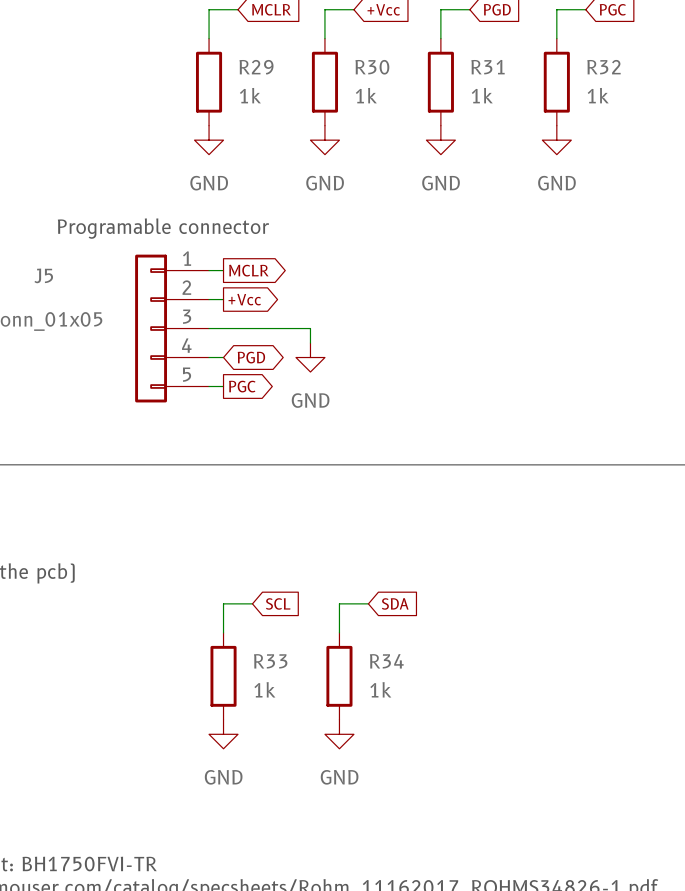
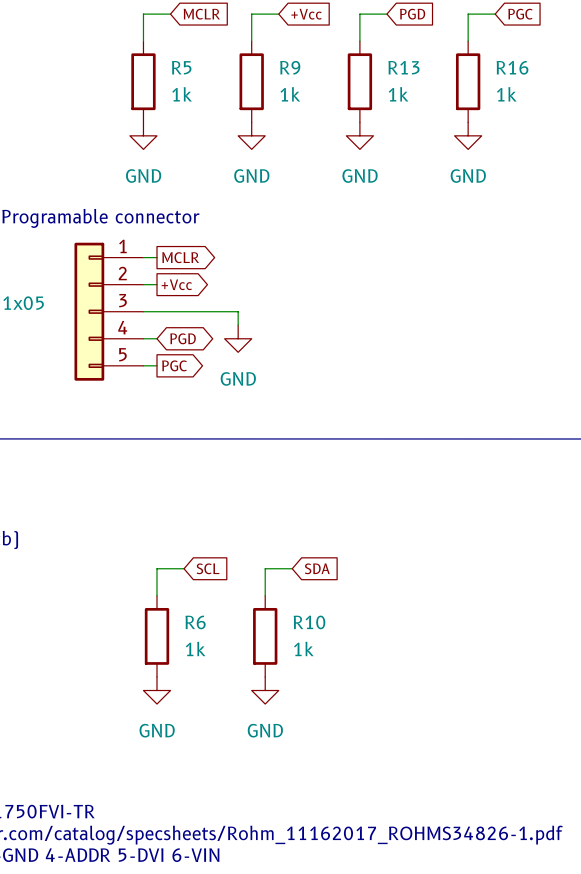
R29 name: R29 (256, 67) -> R5 (181, 67)
R30 name: R30 (372, 67) -> R9 (290, 67)
R31 name: R31 (488, 67) -> R13 (403, 67)
R32 name: R32 (603, 67) -> R16 (512, 67)
R33 name: R33 (270, 661) -> R6 (195, 622)
R34 name: R34 (386, 661) -> R10 (309, 622)

